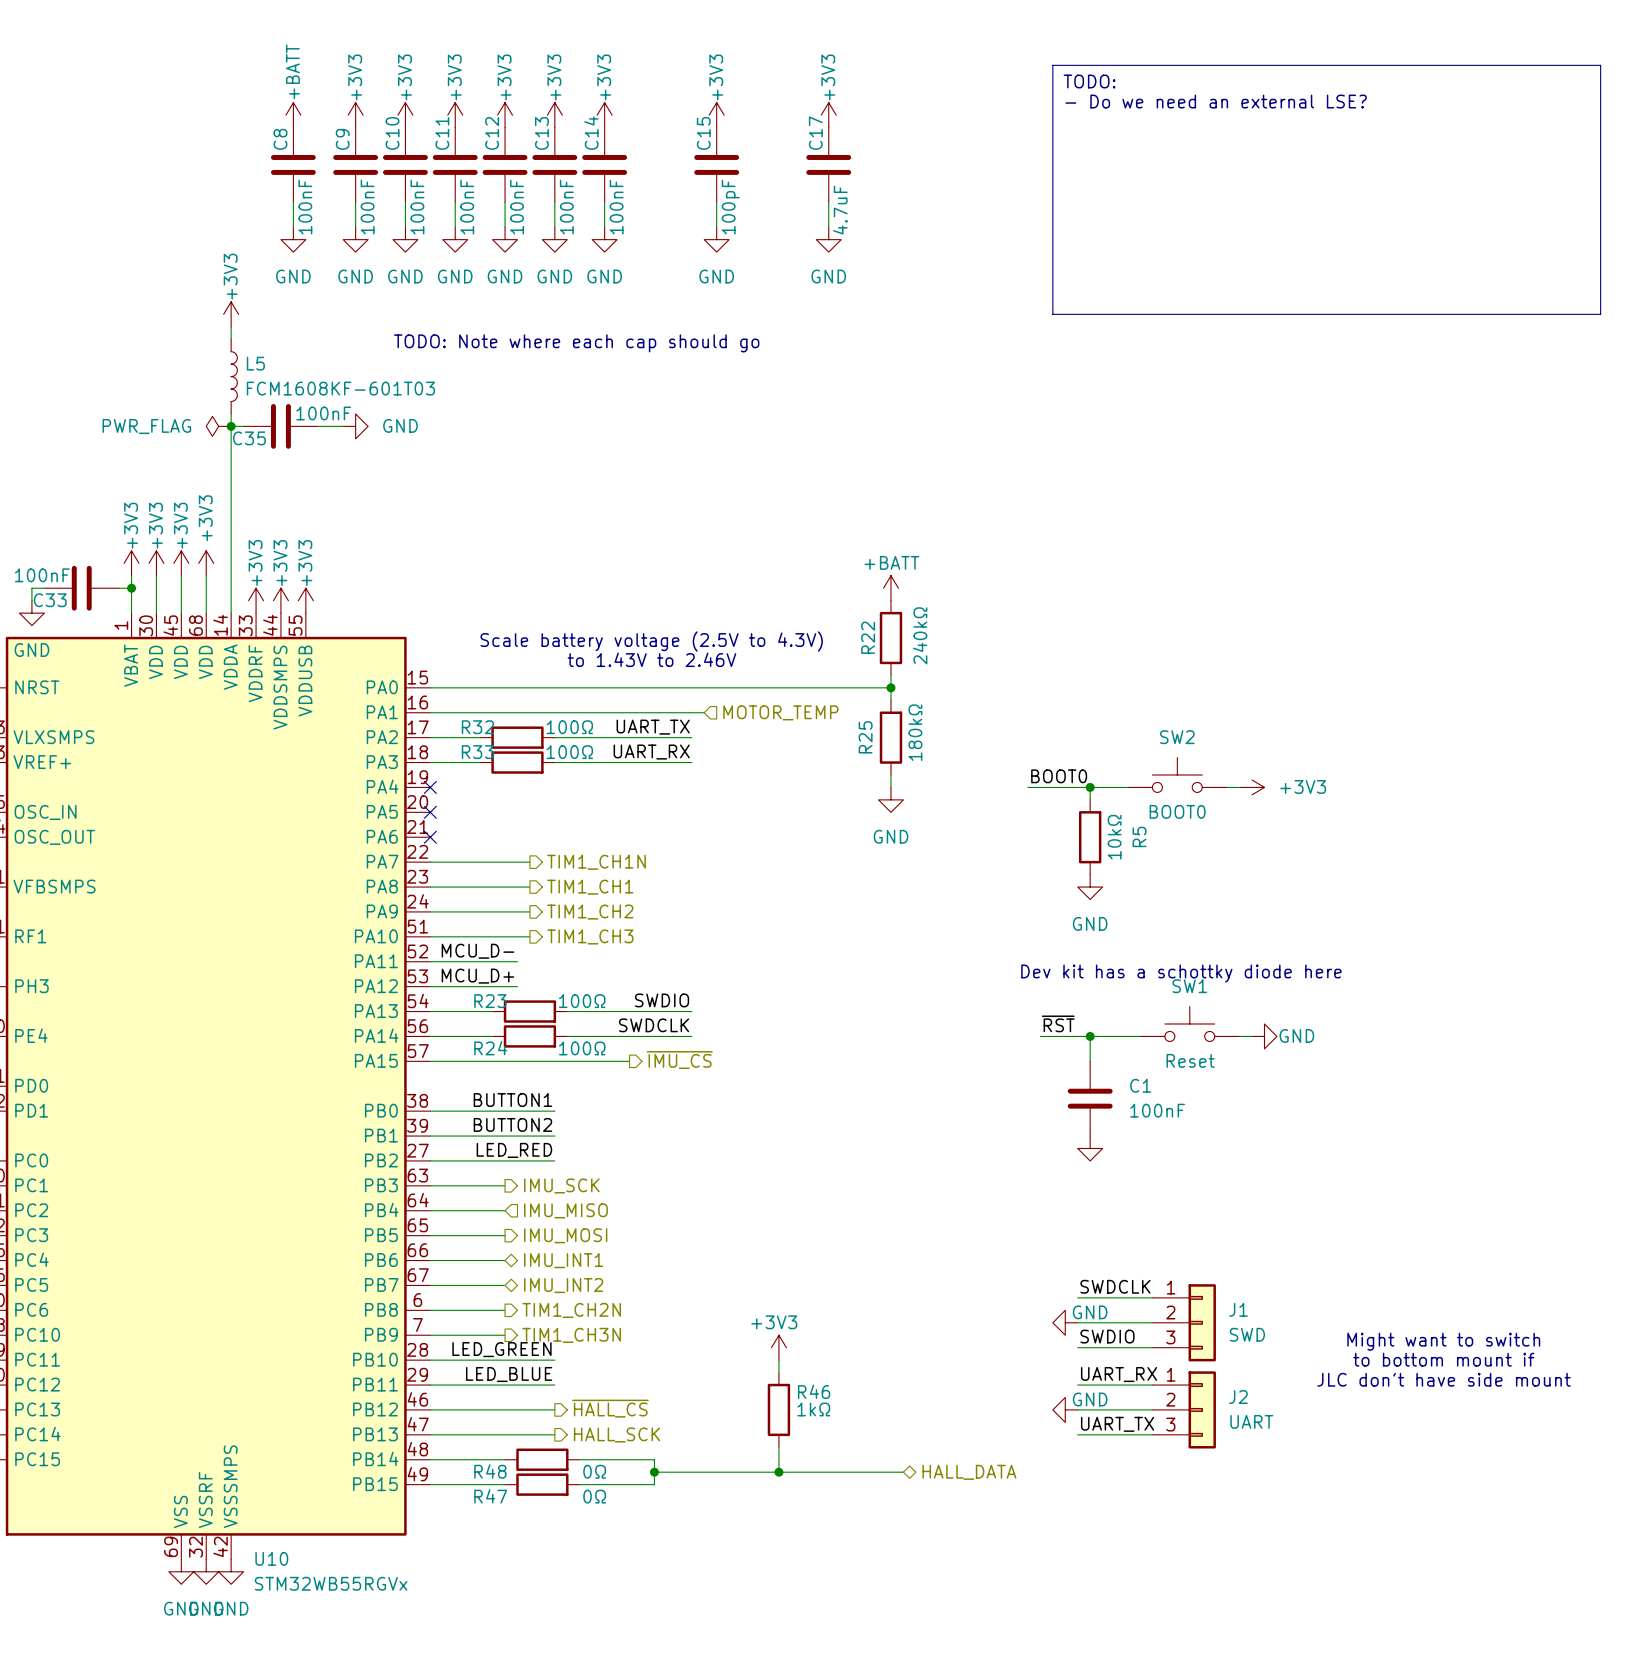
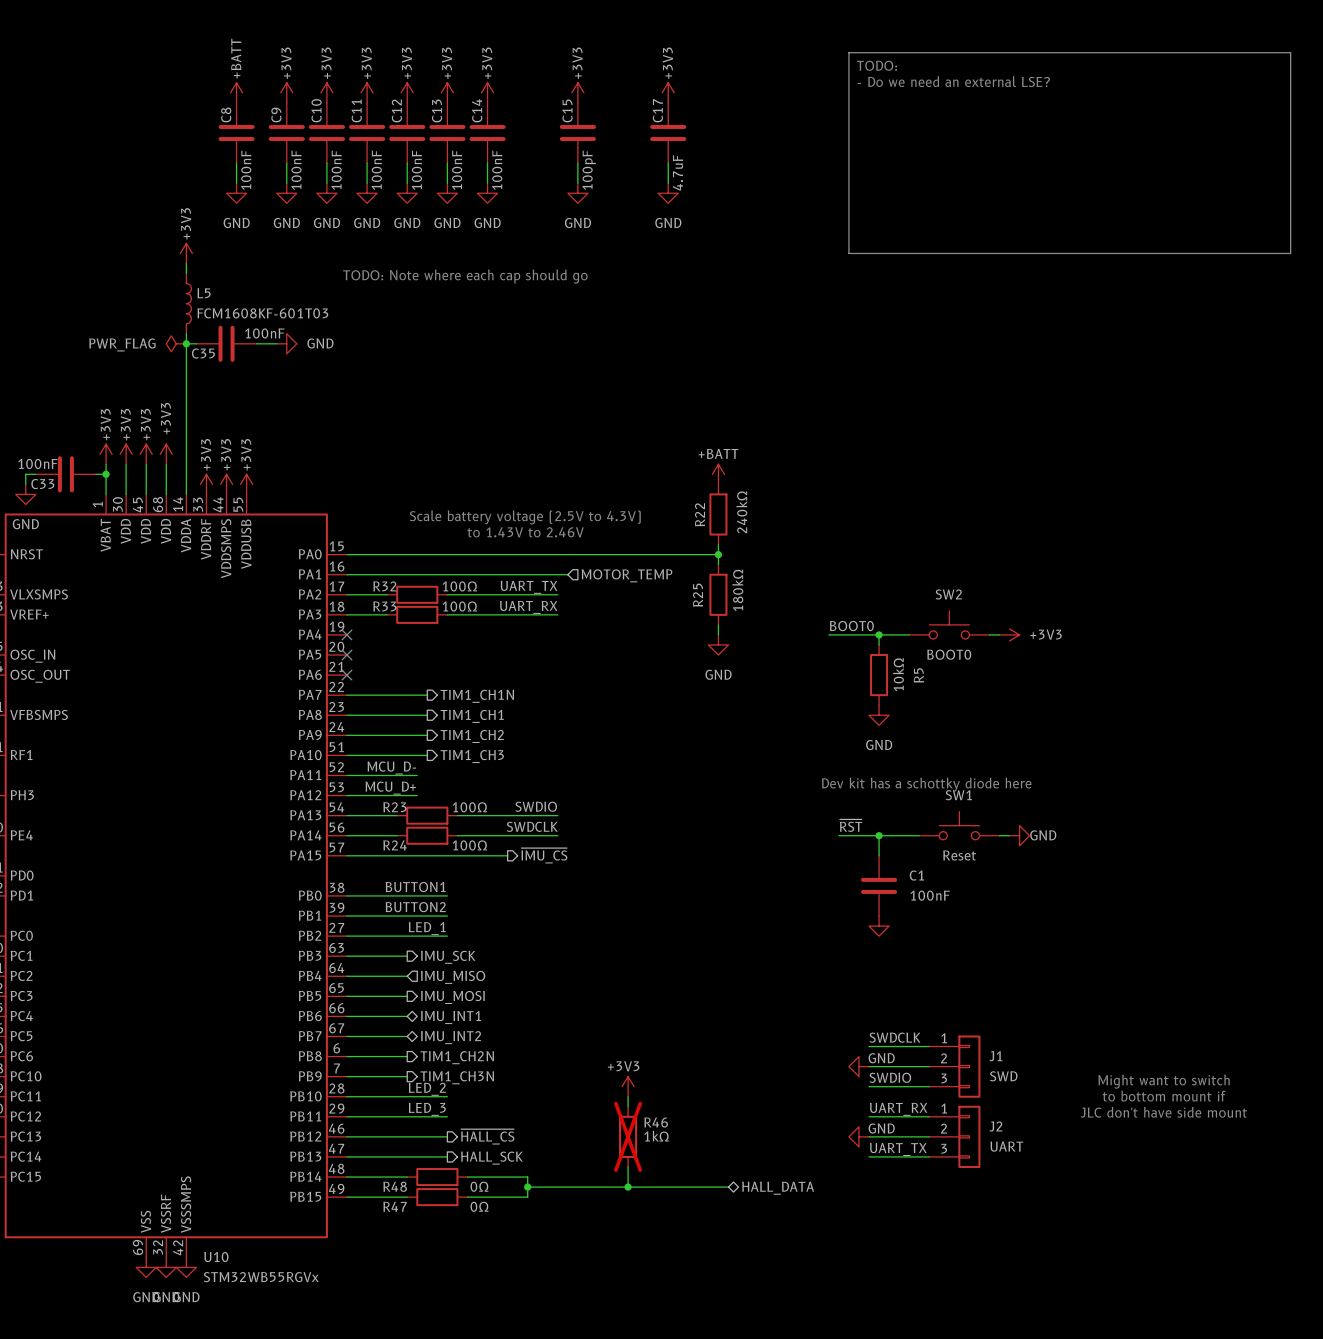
label: LED_RED (514, 1150) -> LED_1 (427, 928)
label: LED_GREEN (501, 1349) -> LED_2 (427, 1089)
label: LED_BLUE (509, 1374) -> LED_3 (427, 1109)
R46 do-not-place cross: none -> (628, 1136)

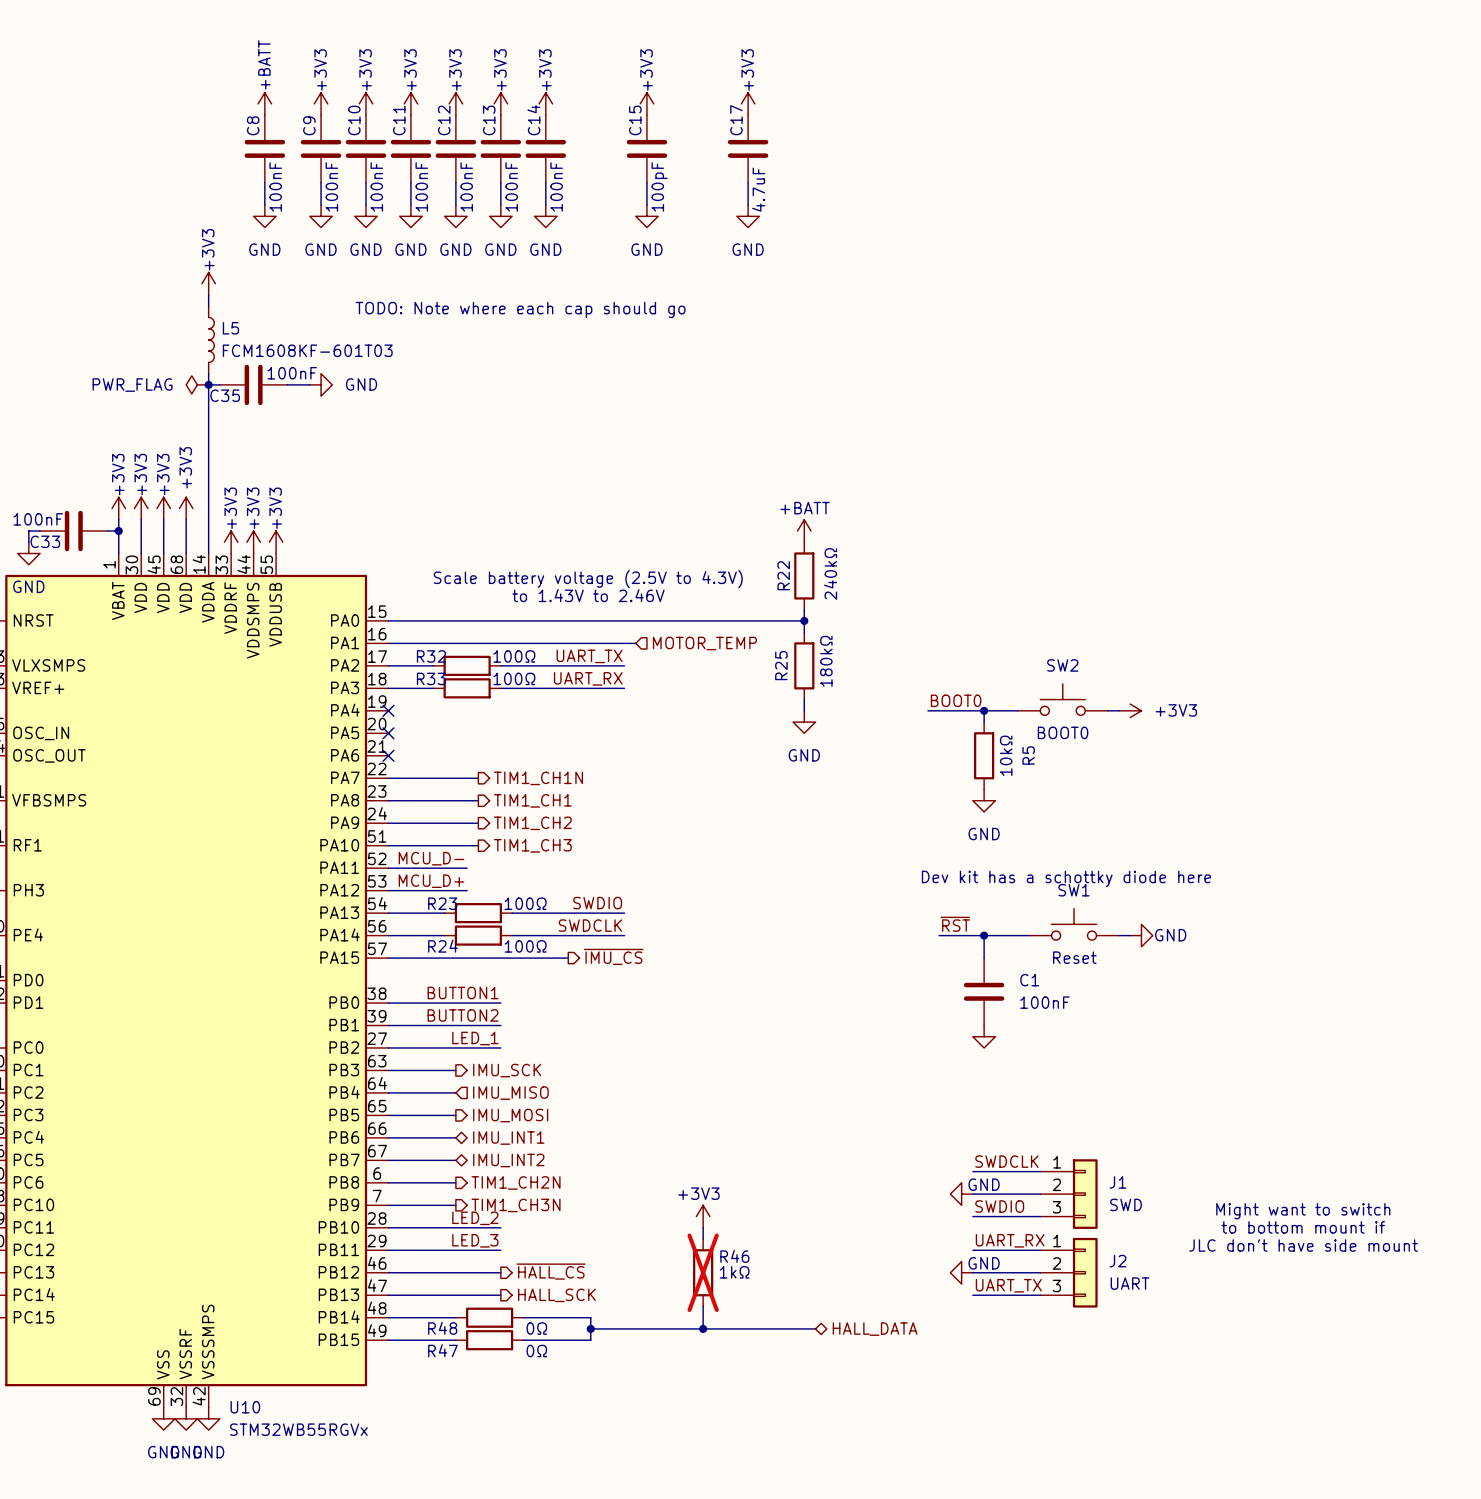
line: (848, 52) (1290, 52) (1290, 253) (848, 253) (848, 52) -> none
text: TODO: (877, 65) -> none
text: - Do we need an external LSE? (953, 81) -> none

